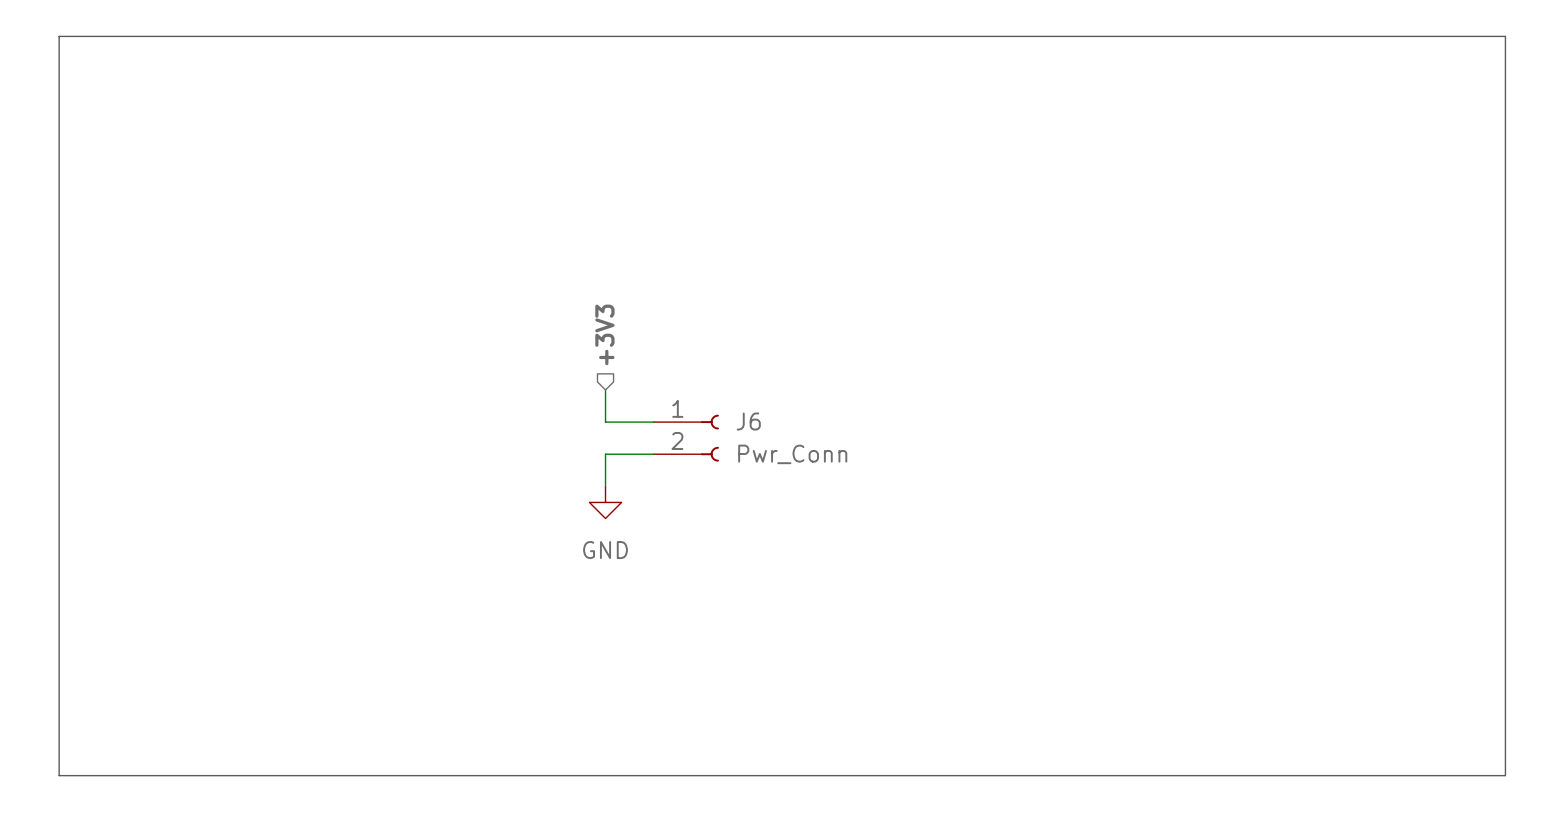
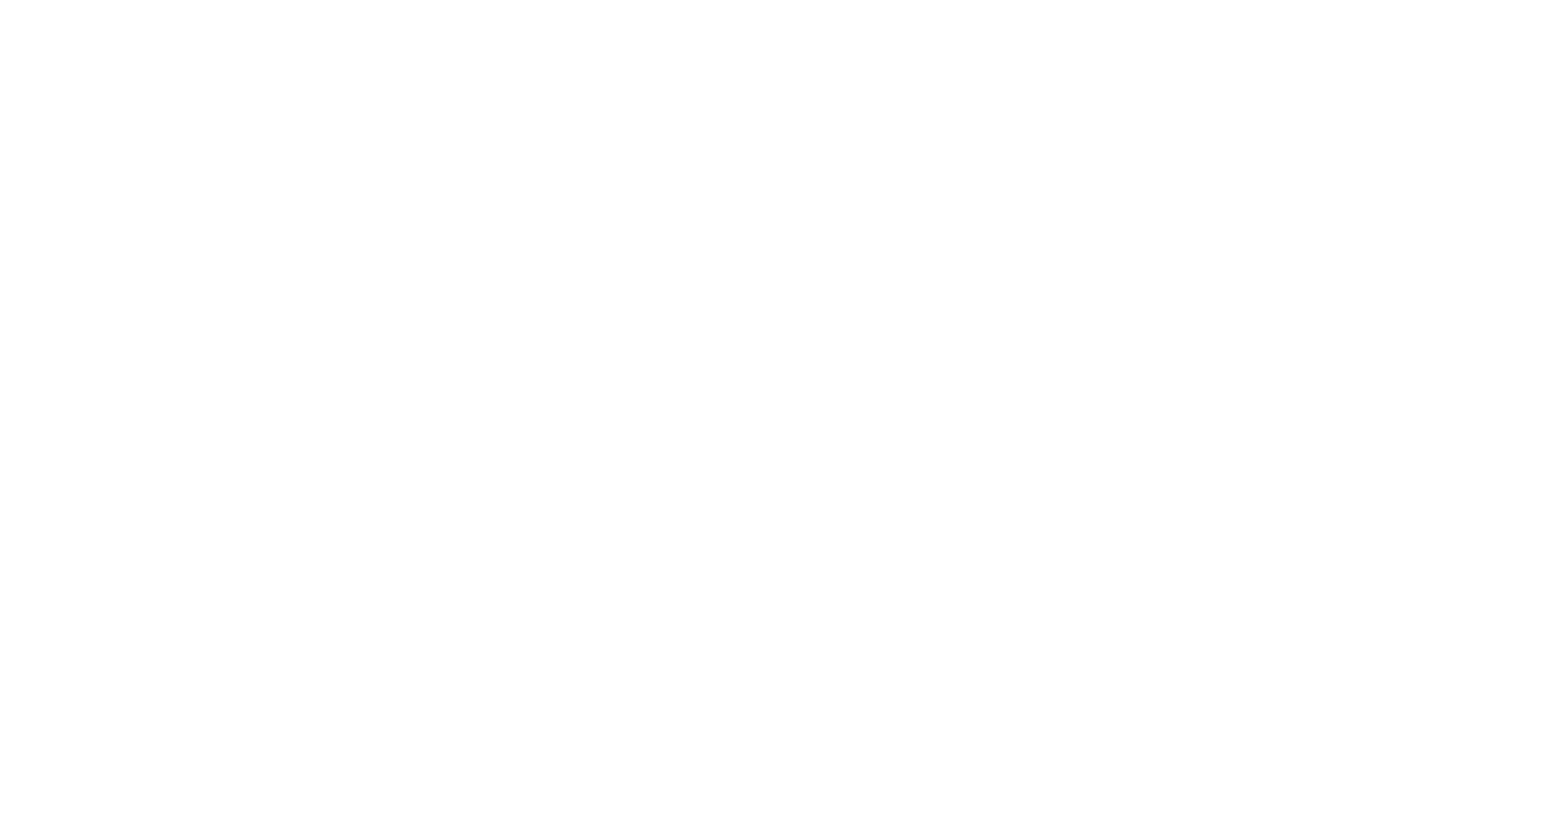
line: (59, 36) (1505, 36) (1505, 775) (59, 775) (59, 36) -> none
hierarchical label: +3V3 (604, 334) -> none
wire: (605, 389) (605, 422) (653, 422) -> none
J6: Pwr_Conn (686, 438) -> none
wire: (653, 454) (605, 454) (605, 486) -> none
power symbol: GND (605, 502) -> none

